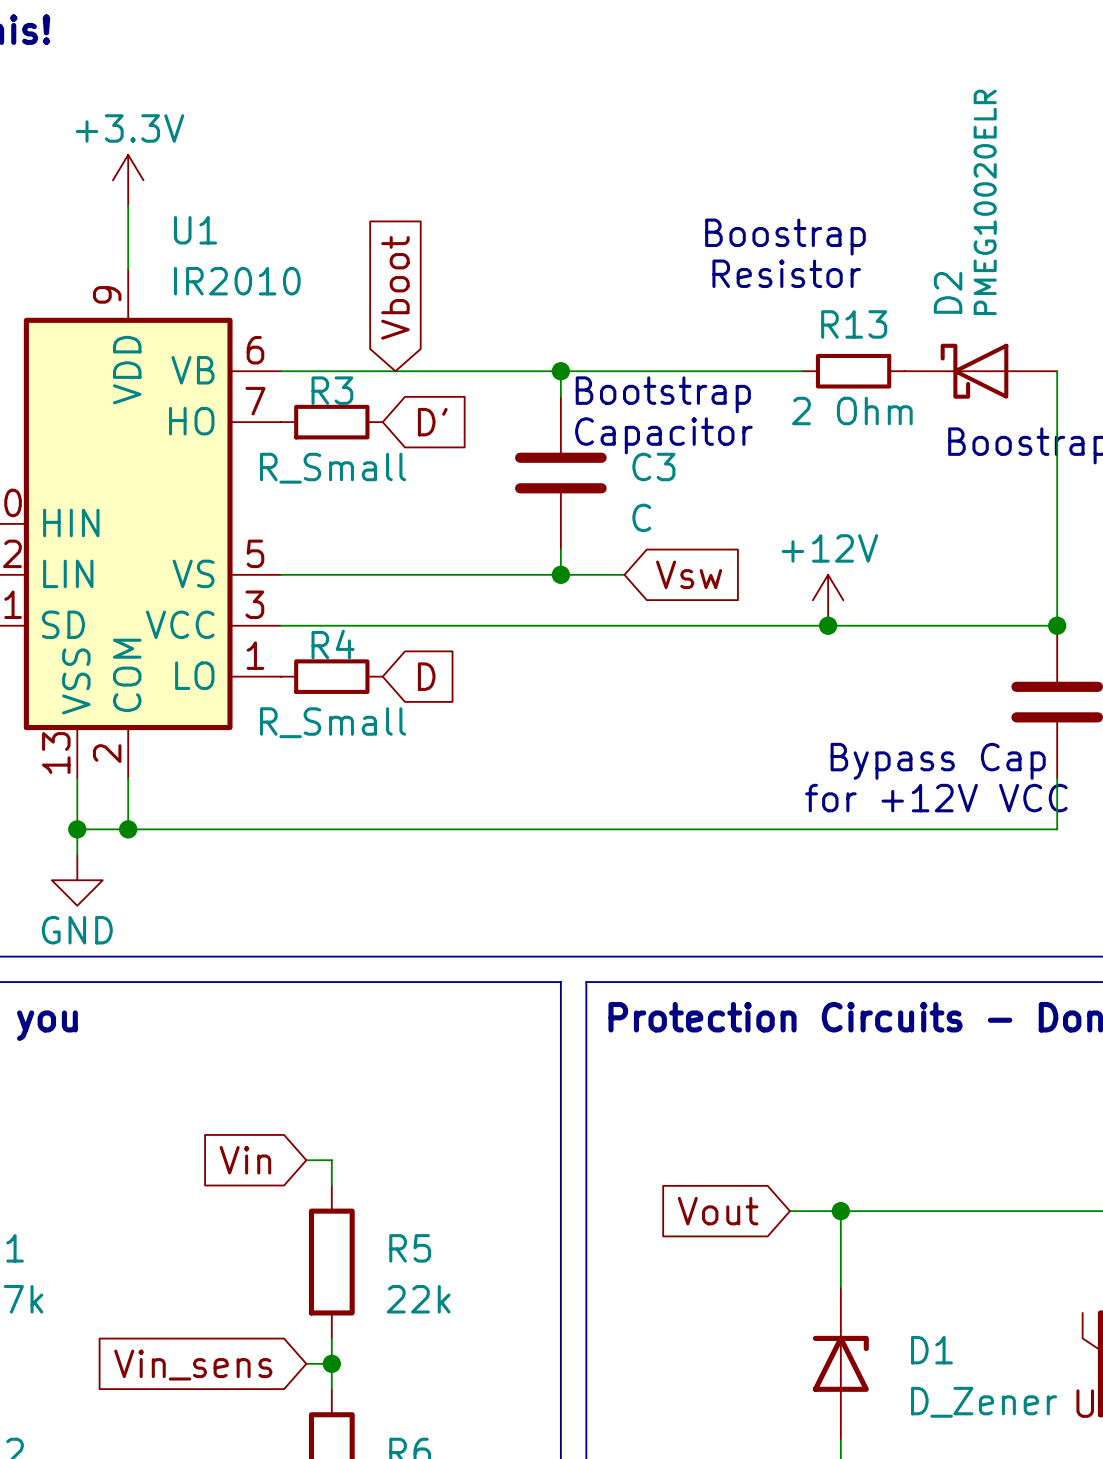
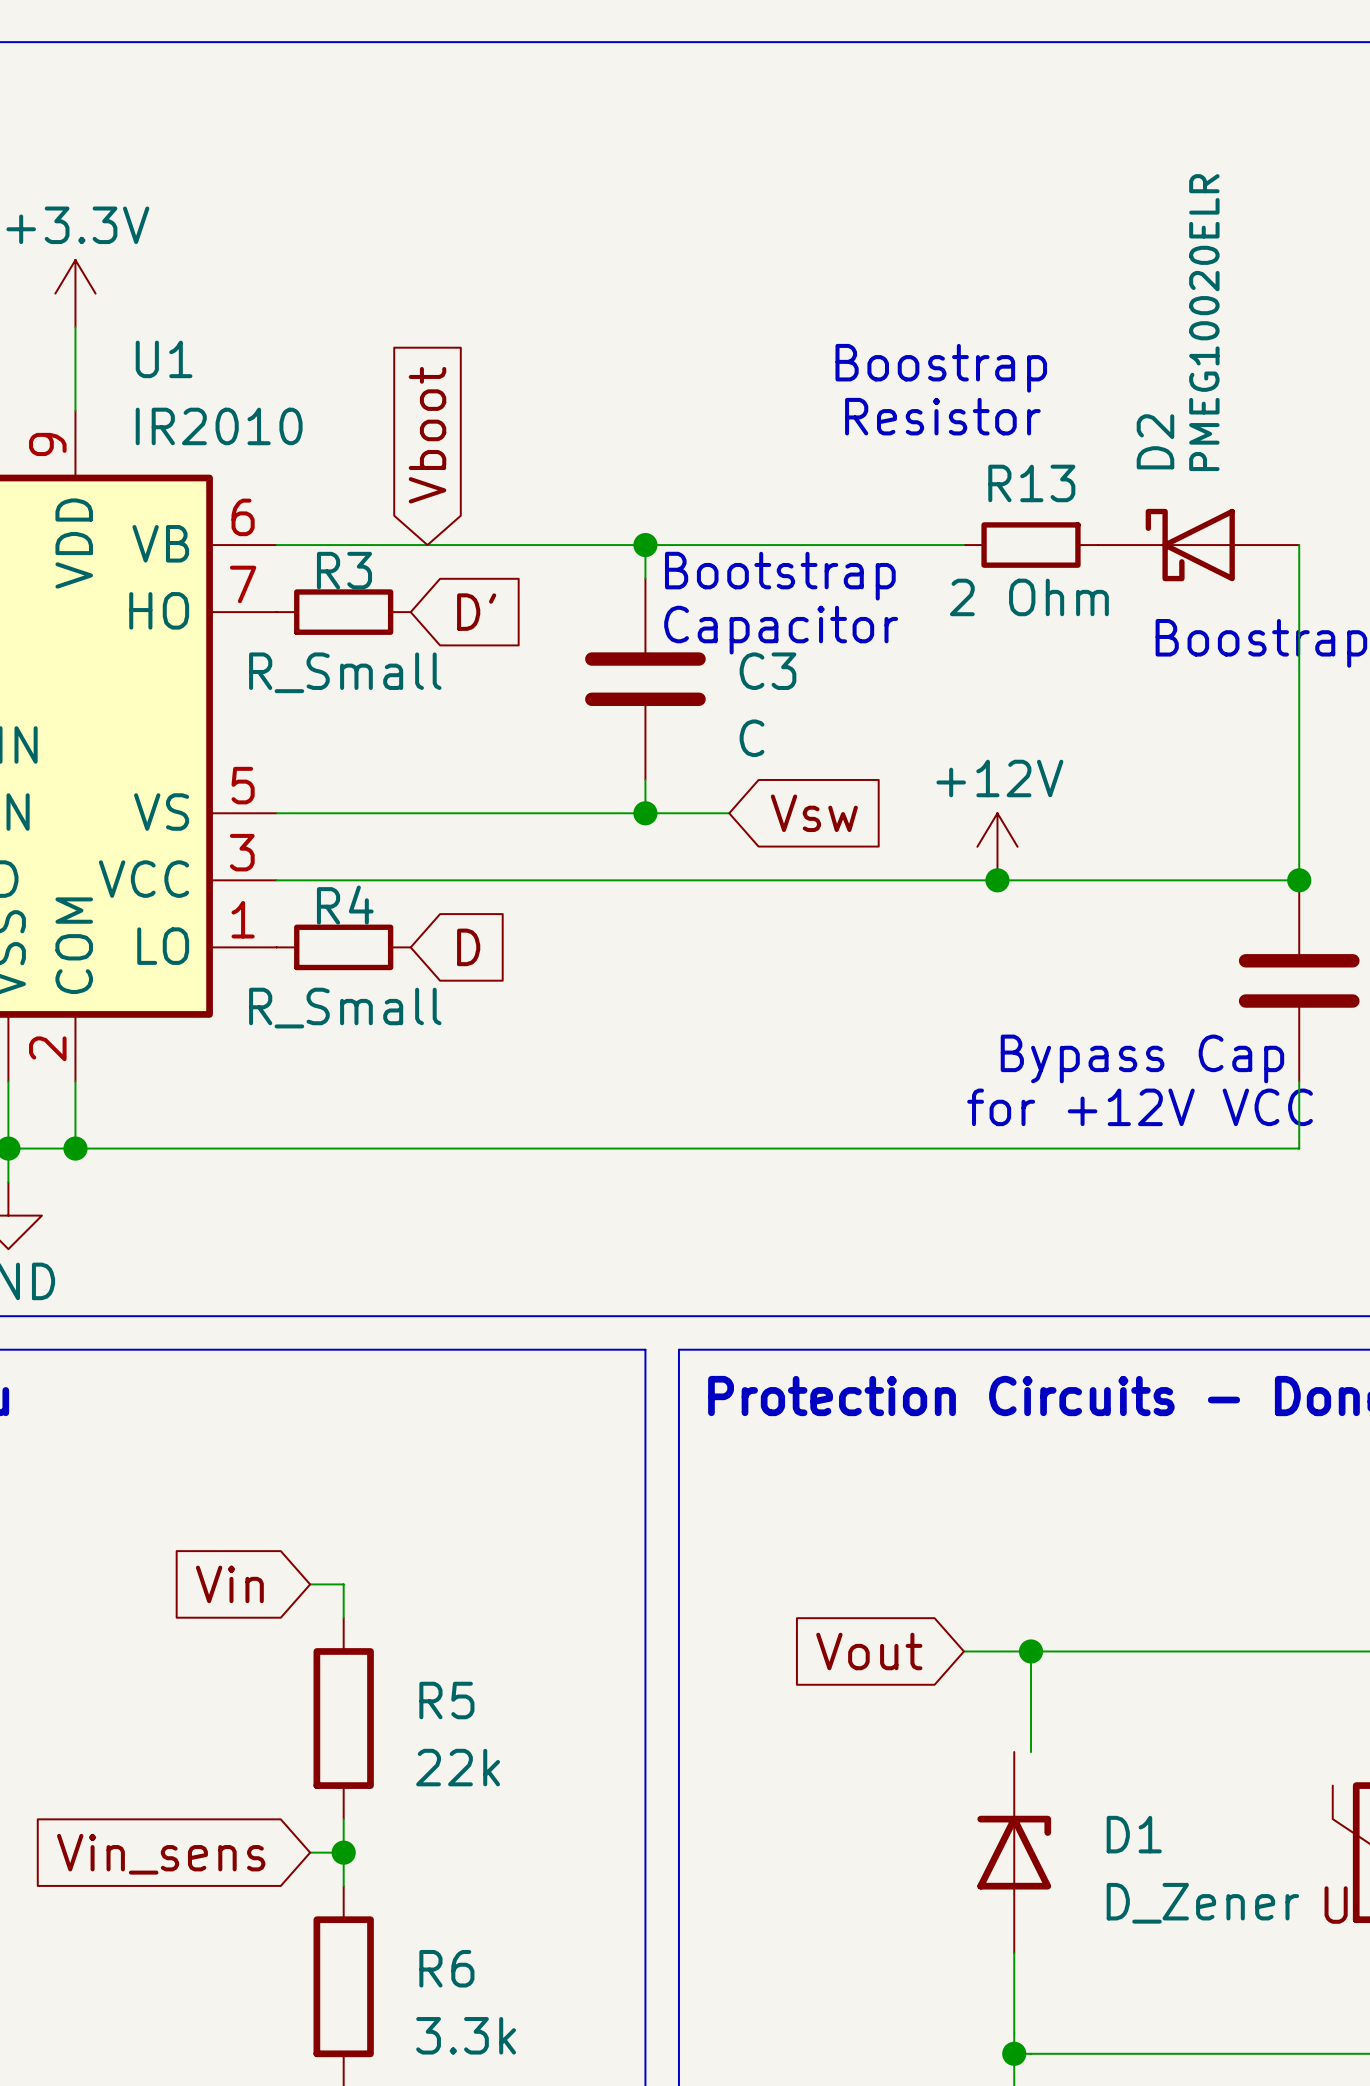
global label position: Vout (718, 1211) -> Vout (869, 1651)
wire: (789, 1211) (802, 1211) -> none
wire: (840, 1211) (840, 1287) -> (1031, 1651) (1031, 1752)
junction position: (840, 1211) -> (1031, 1651)

